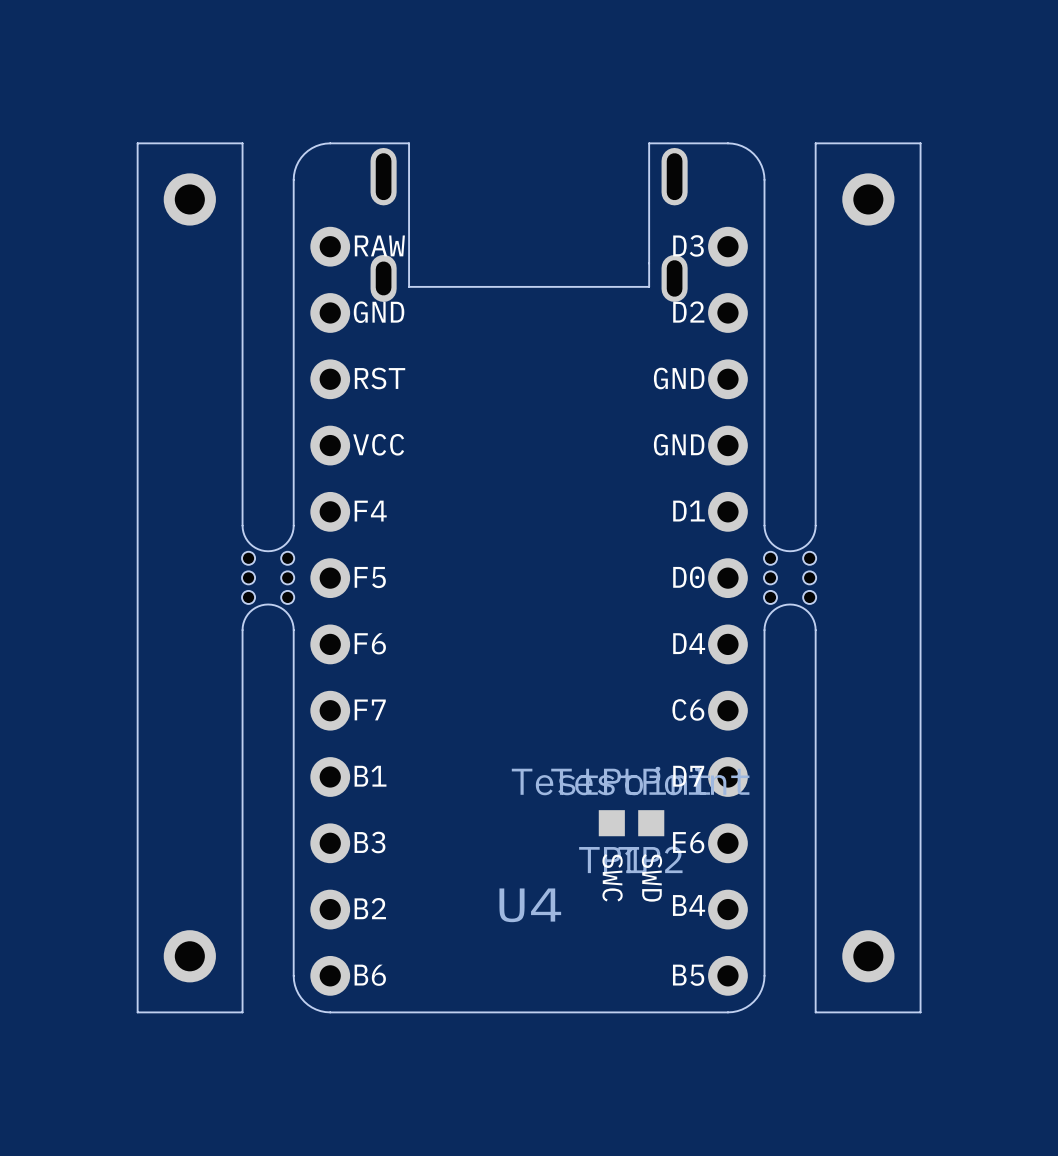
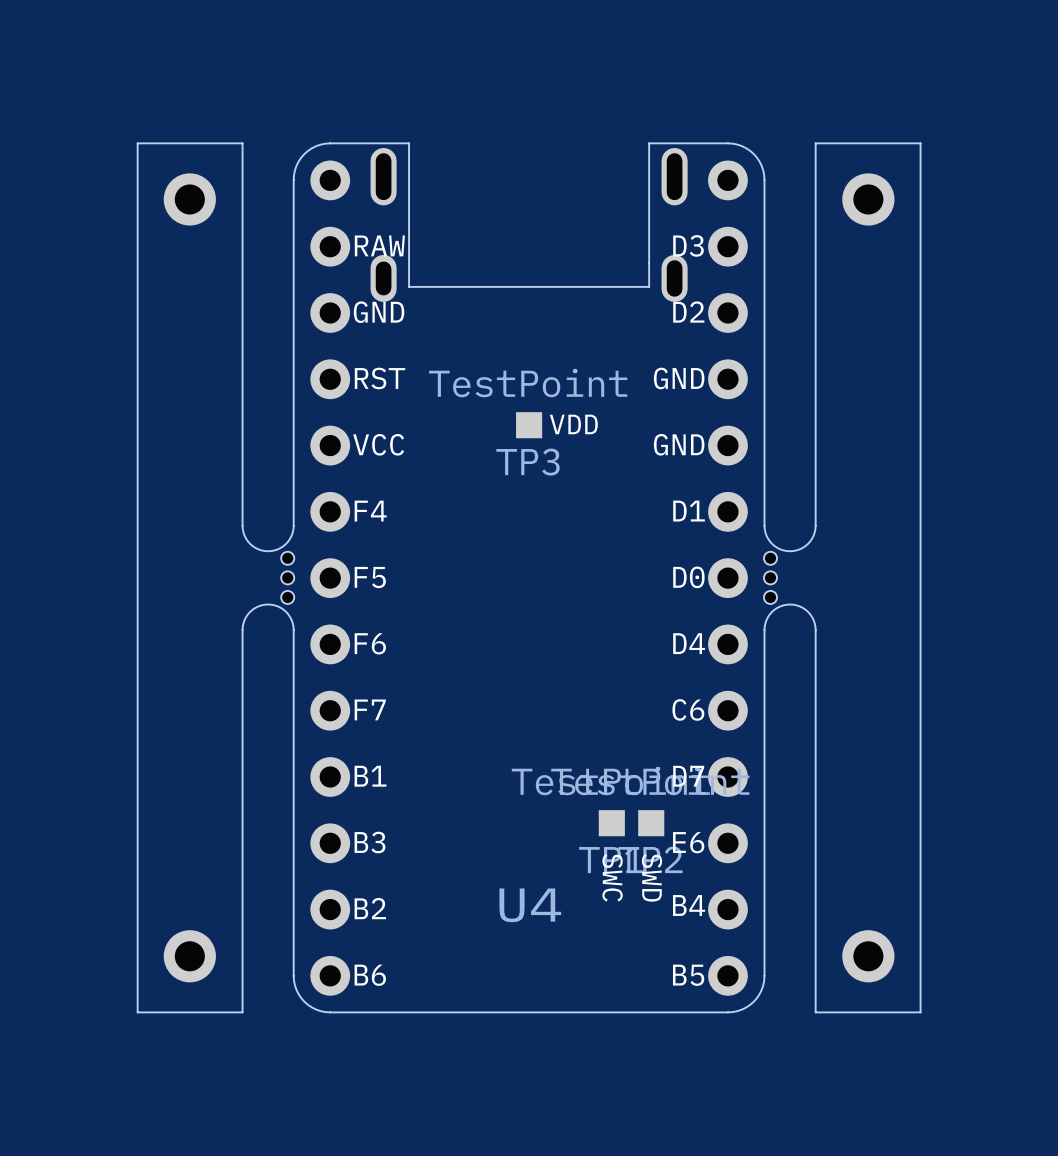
part: none -> (330, 180)
part: none -> (727, 180)
text: none -> VDD (573, 424)
TP3: none -> TestPoint (529, 425)
part footprint: [242, 551, 295, 604] -> [281, 551, 295, 604]
part footprint: [763, 551, 817, 604] -> [763, 551, 778, 604]

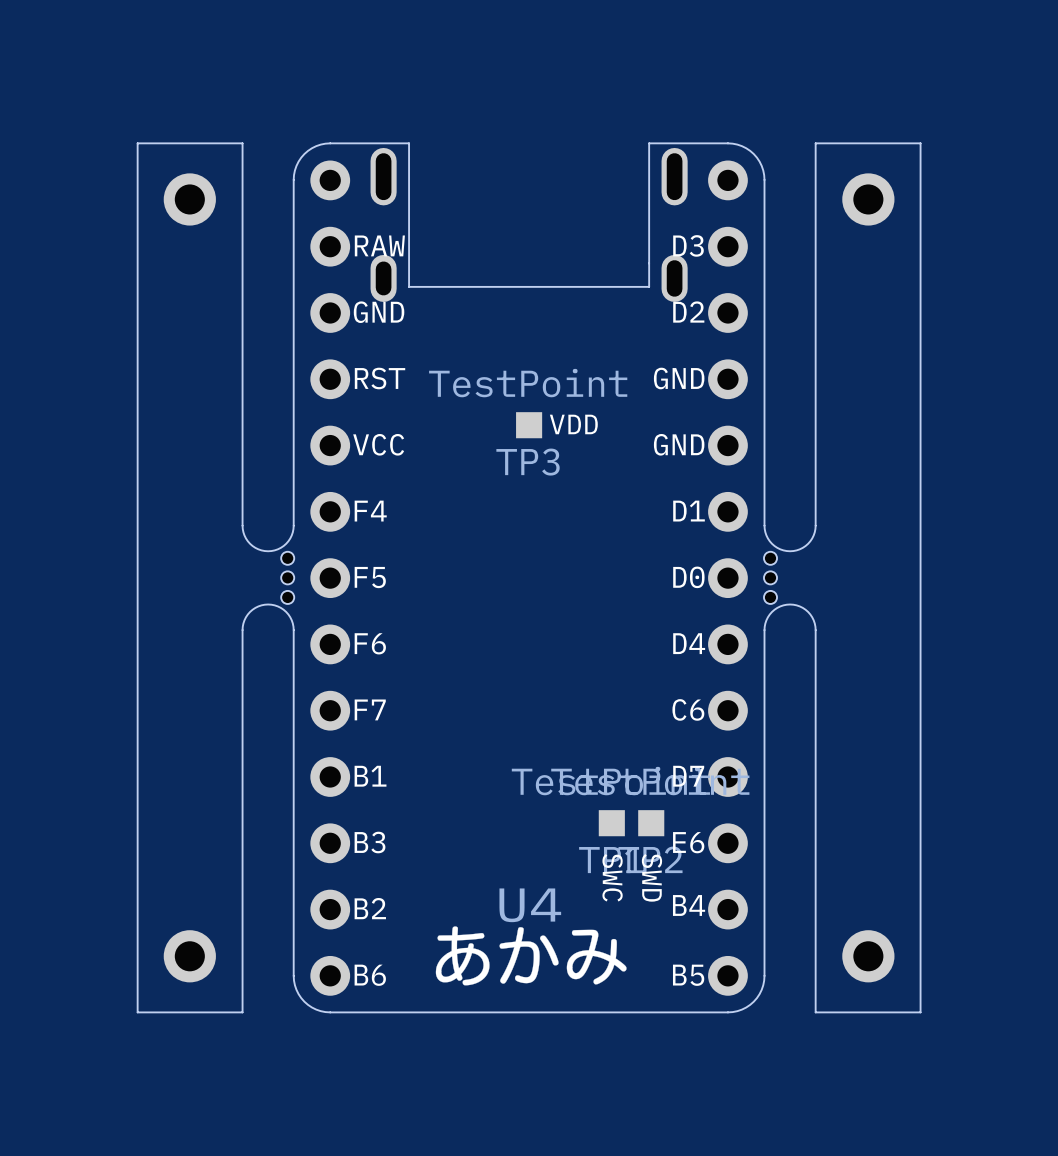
drawing: none -> [435, 926, 627, 986]

